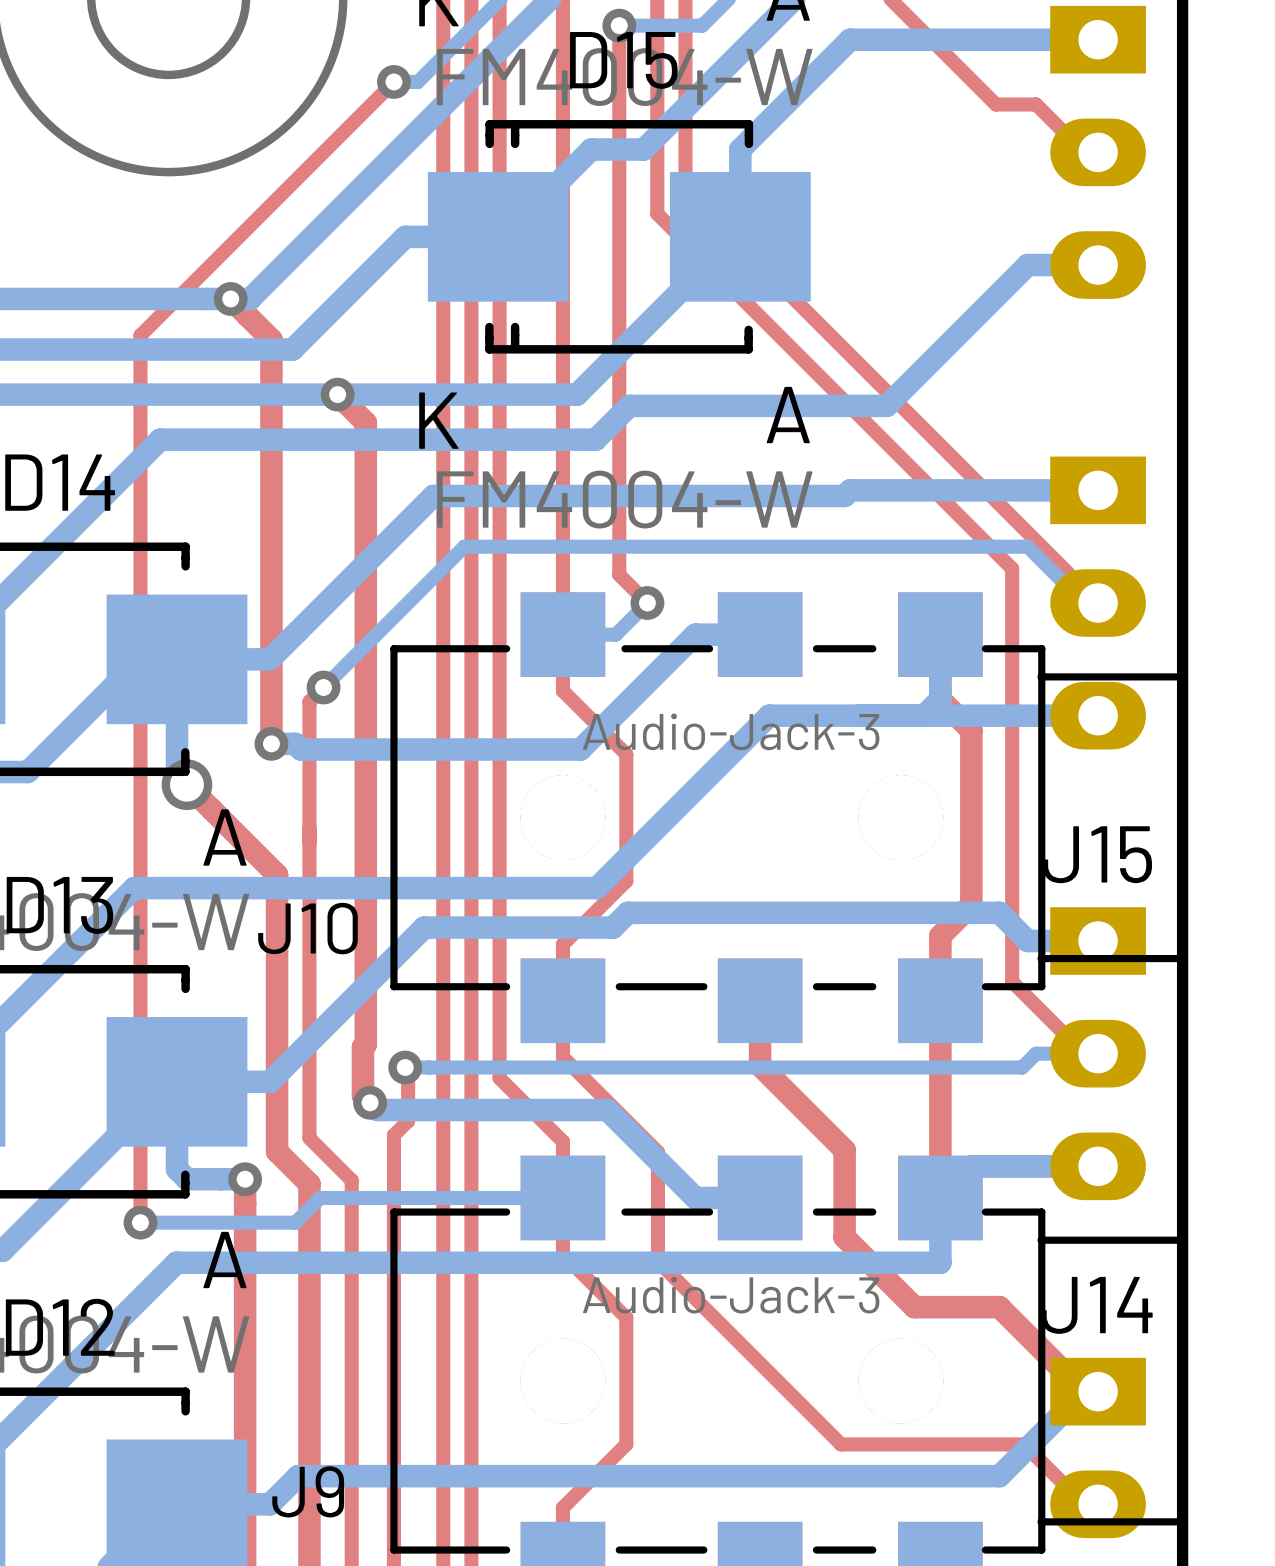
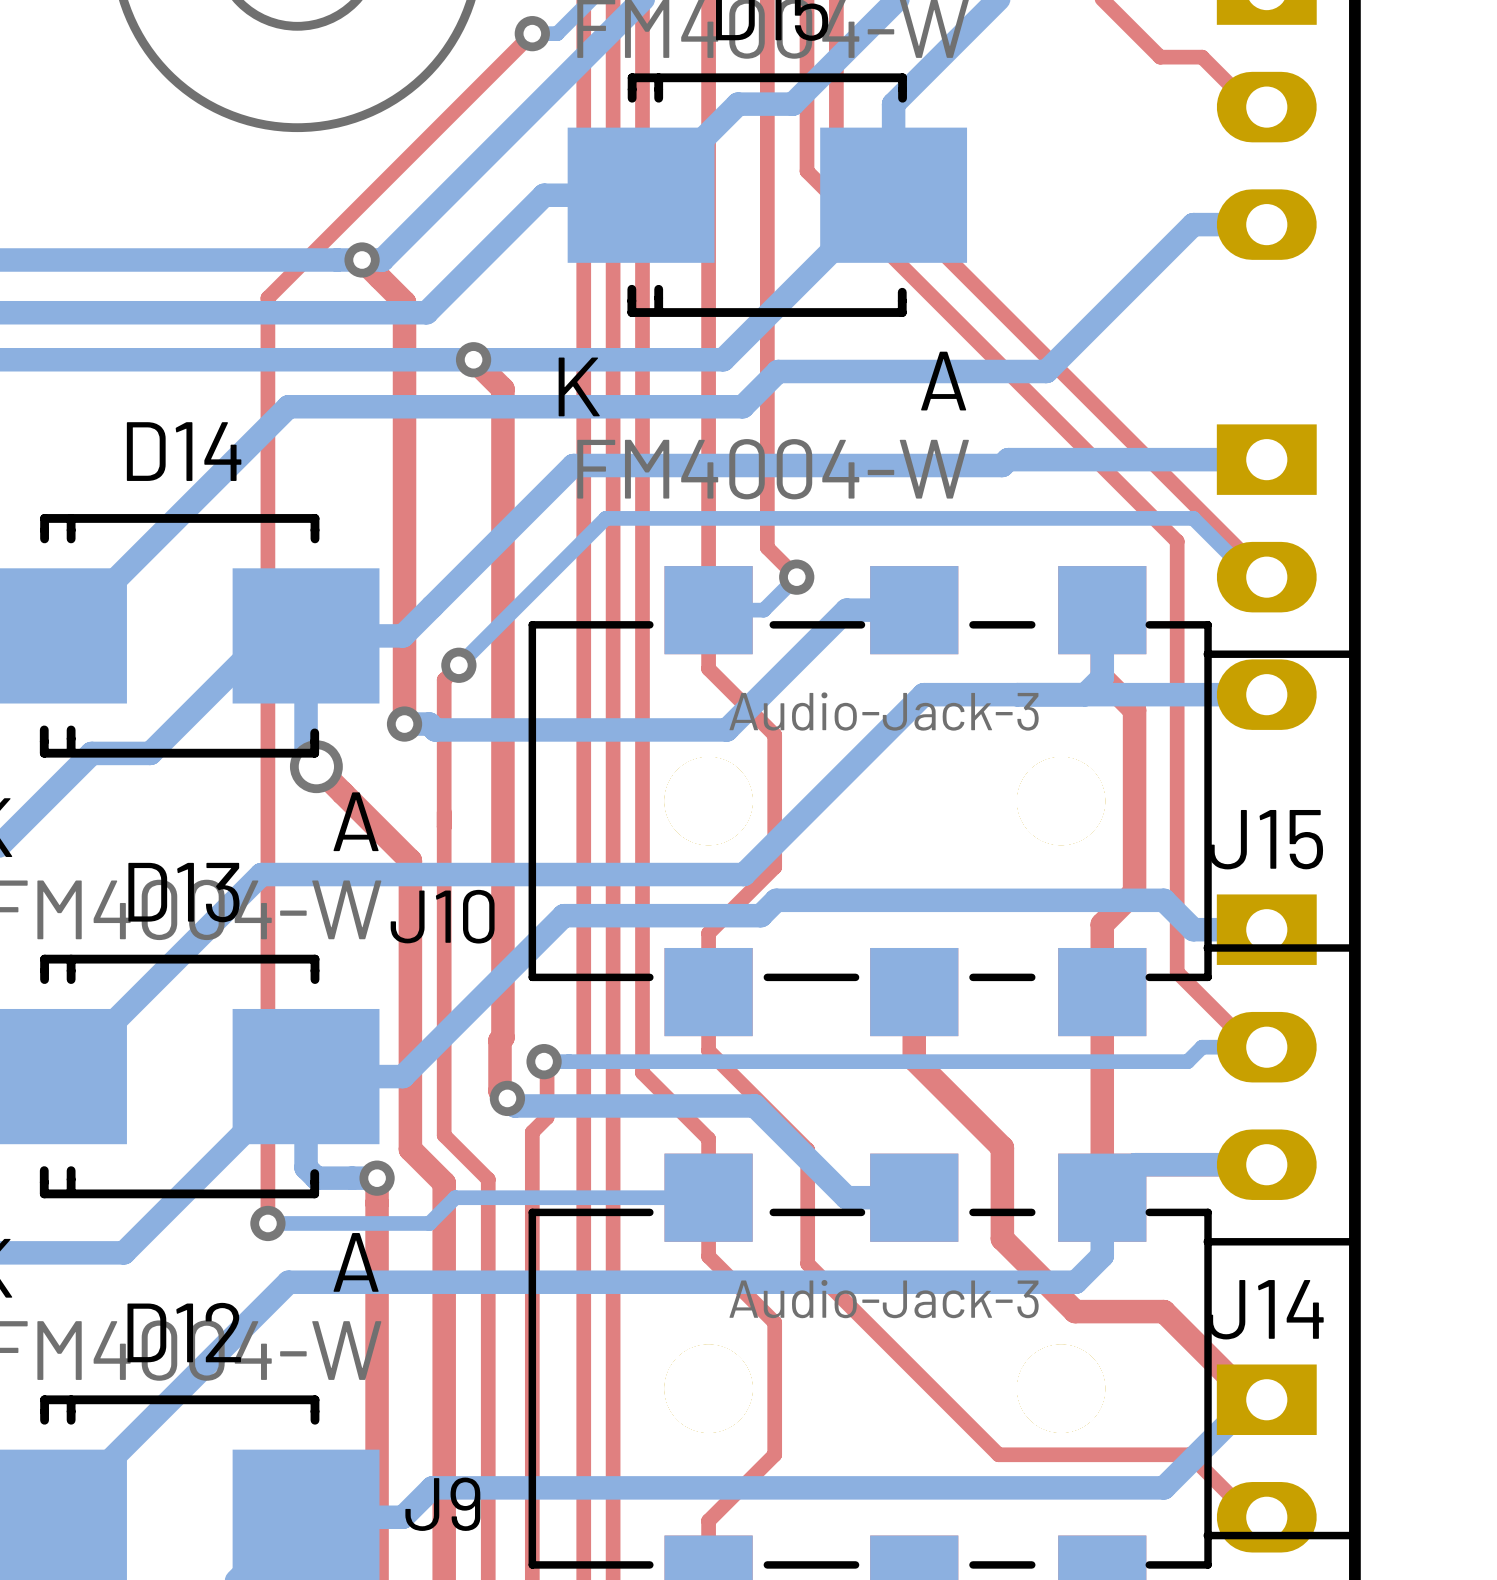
bottom track: (940, 1253) (940, 1262) (176, 1262) (160, 1278) -> (1102, 1255) (1075, 1282) (288, 1282)

